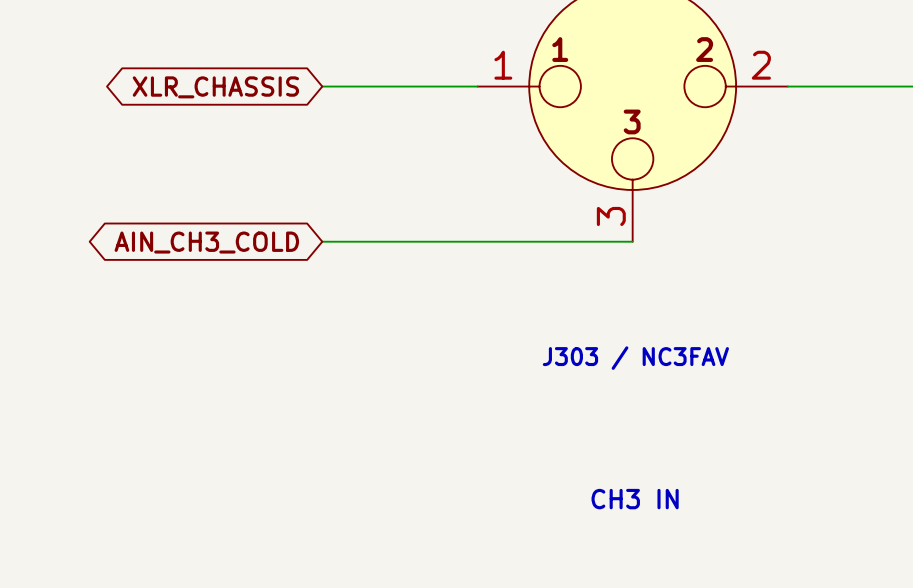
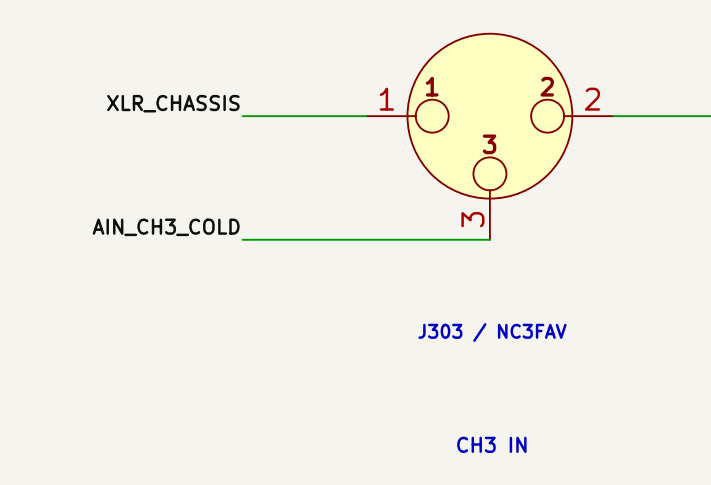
label: none -> XLR_CHASSIS (173, 103)
global label: XLR_CHASSIS (215, 87) -> none
label: none -> AIN_CH3_COLD (166, 227)
global label: AIN_CH3_COLD (206, 242) -> none

